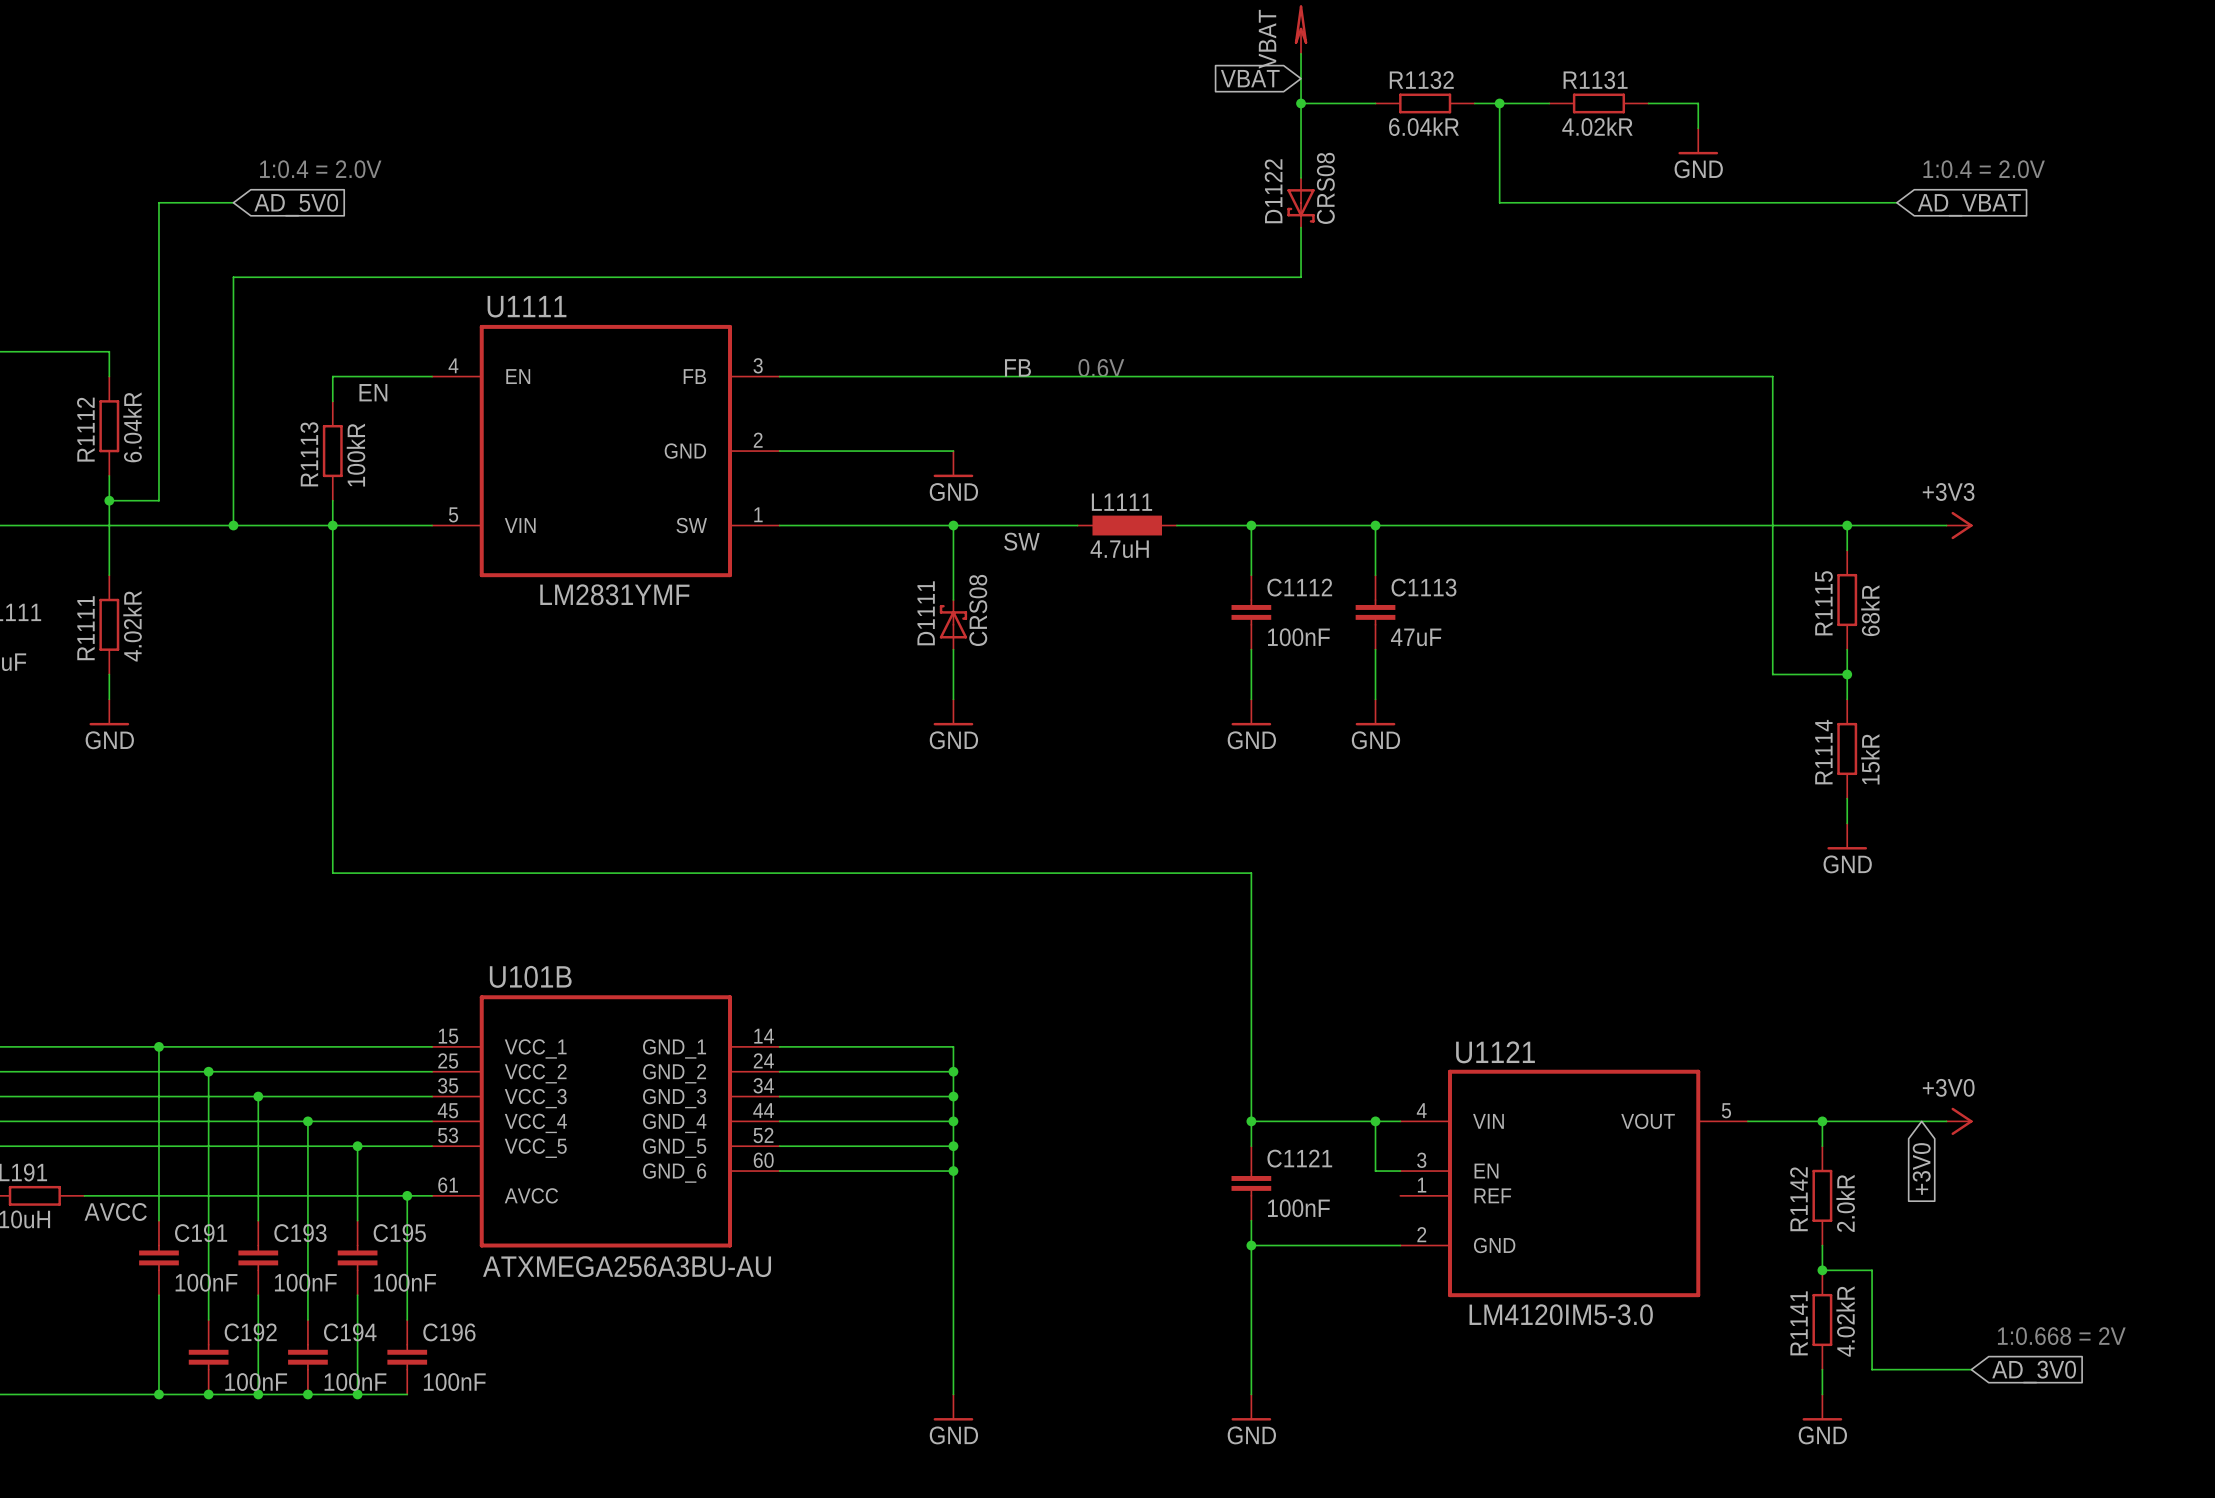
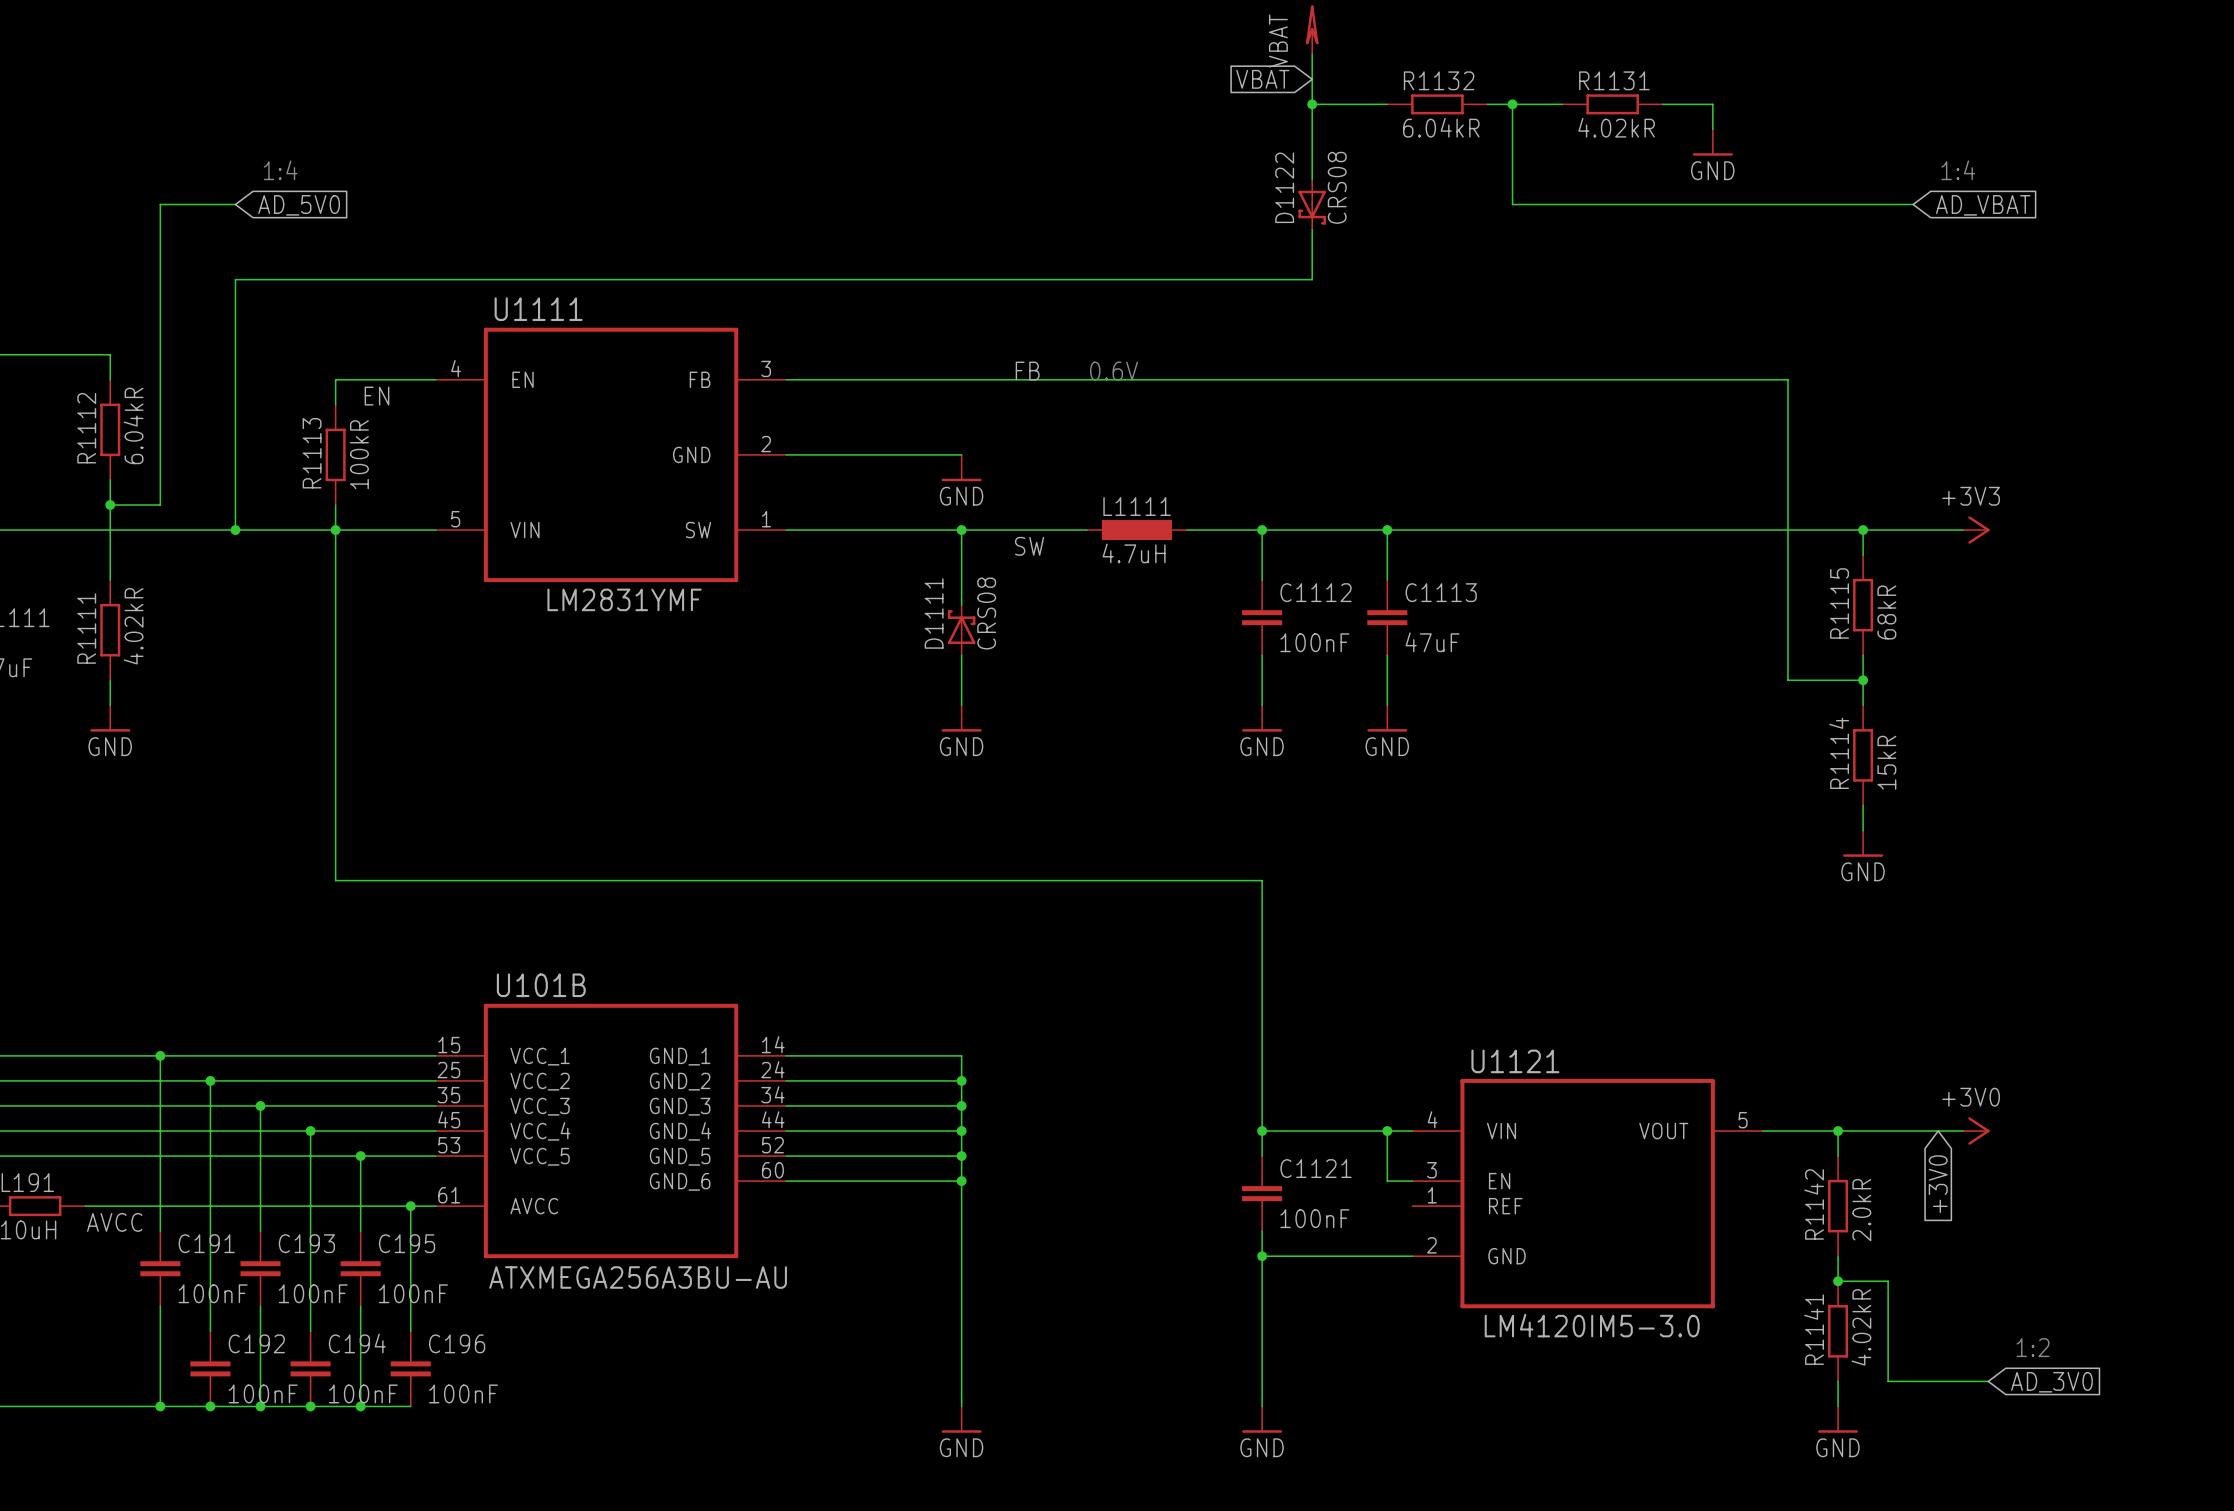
text: 1:0.4 = 2.0V (320, 169) -> 1:4 (280, 170)
text: 1:0.4 = 2.0V (1984, 169) -> 1:4 (1958, 170)
text: 1:0.668 = 2V (2061, 1336) -> 1:2 (2033, 1347)

